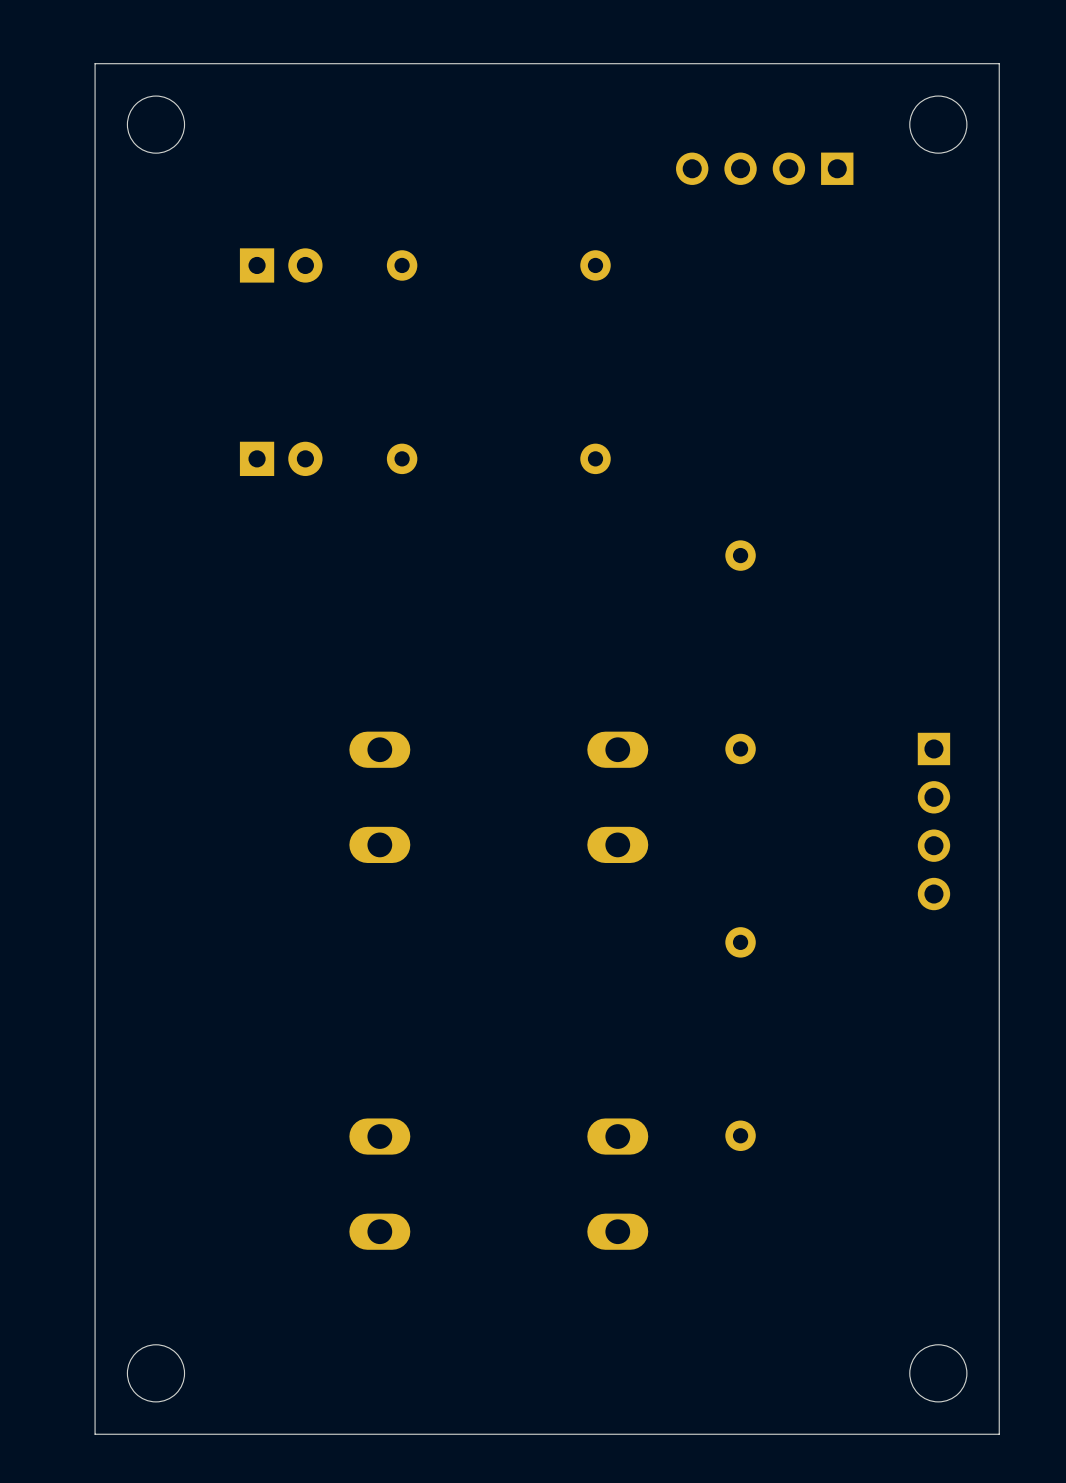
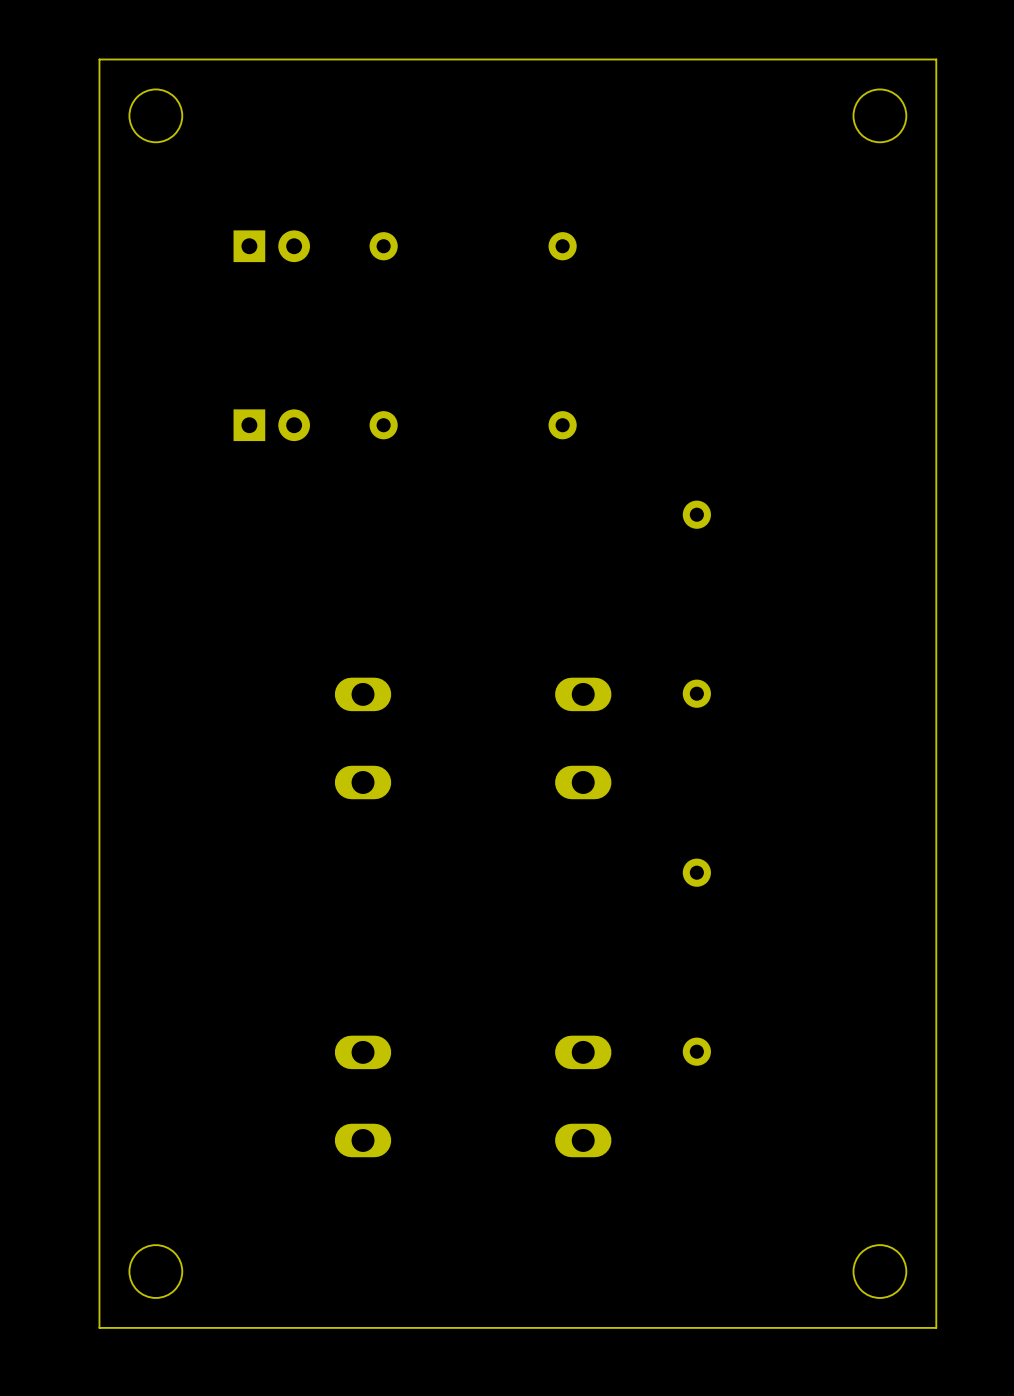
part: (764, 168) -> none
part: (933, 821) -> none

